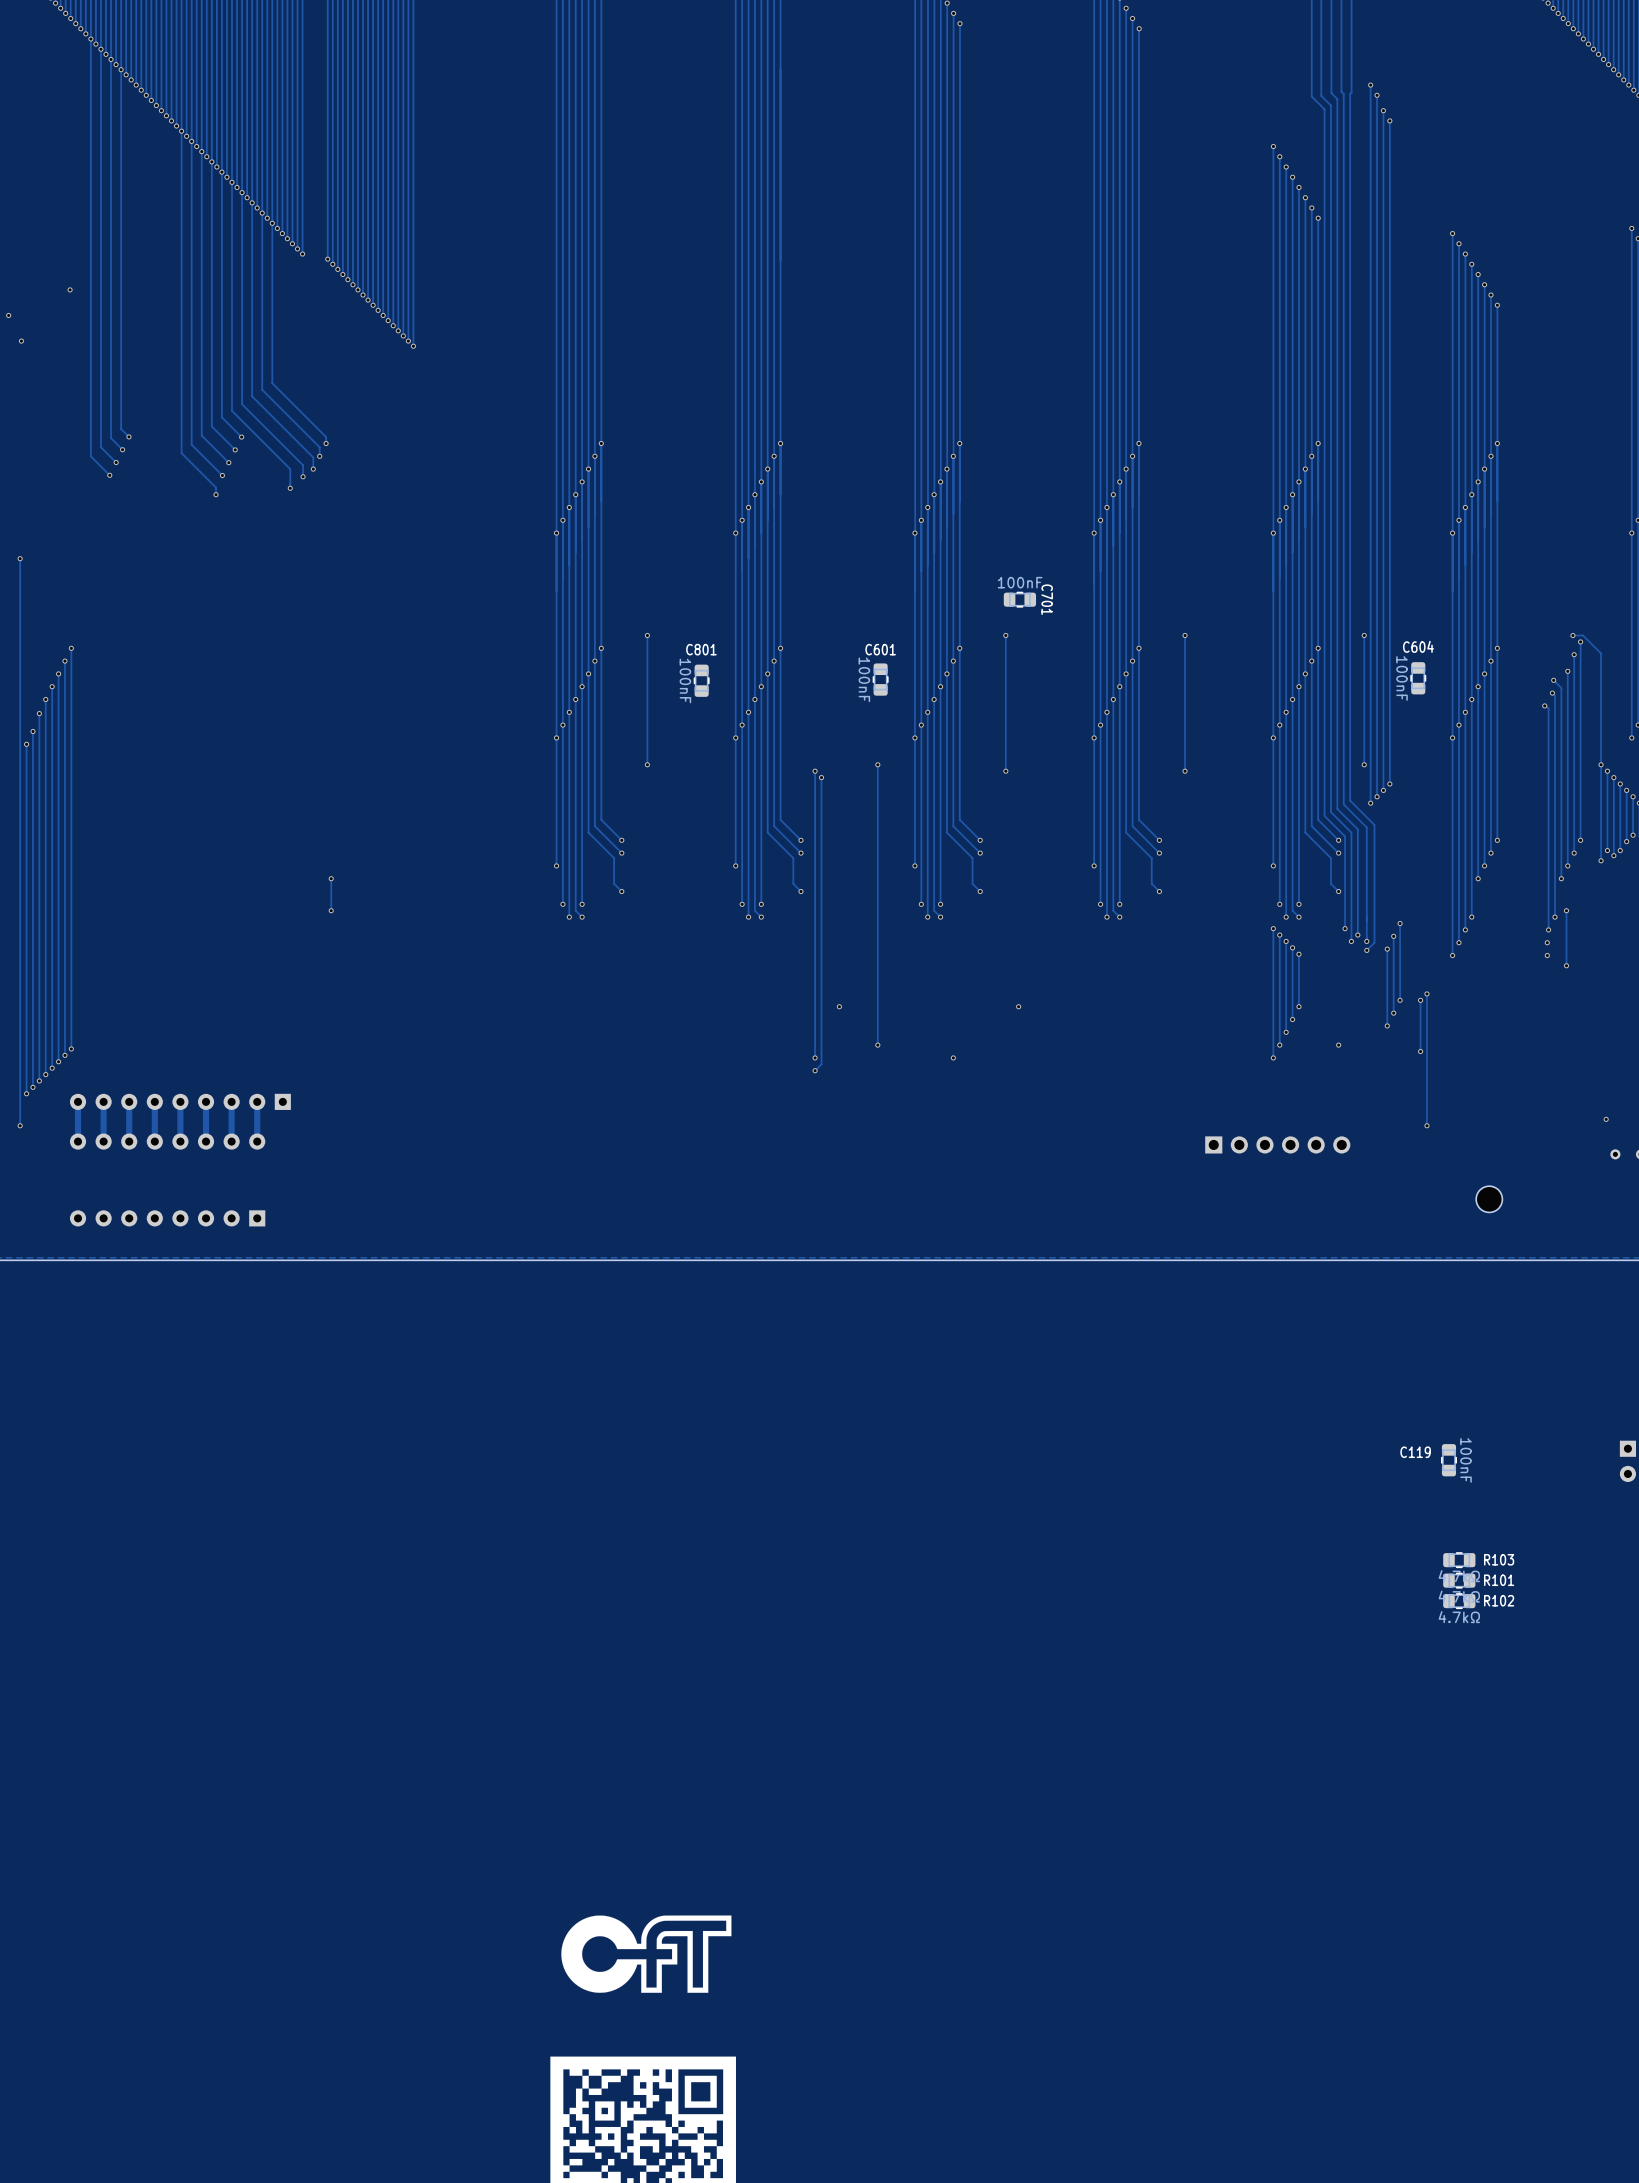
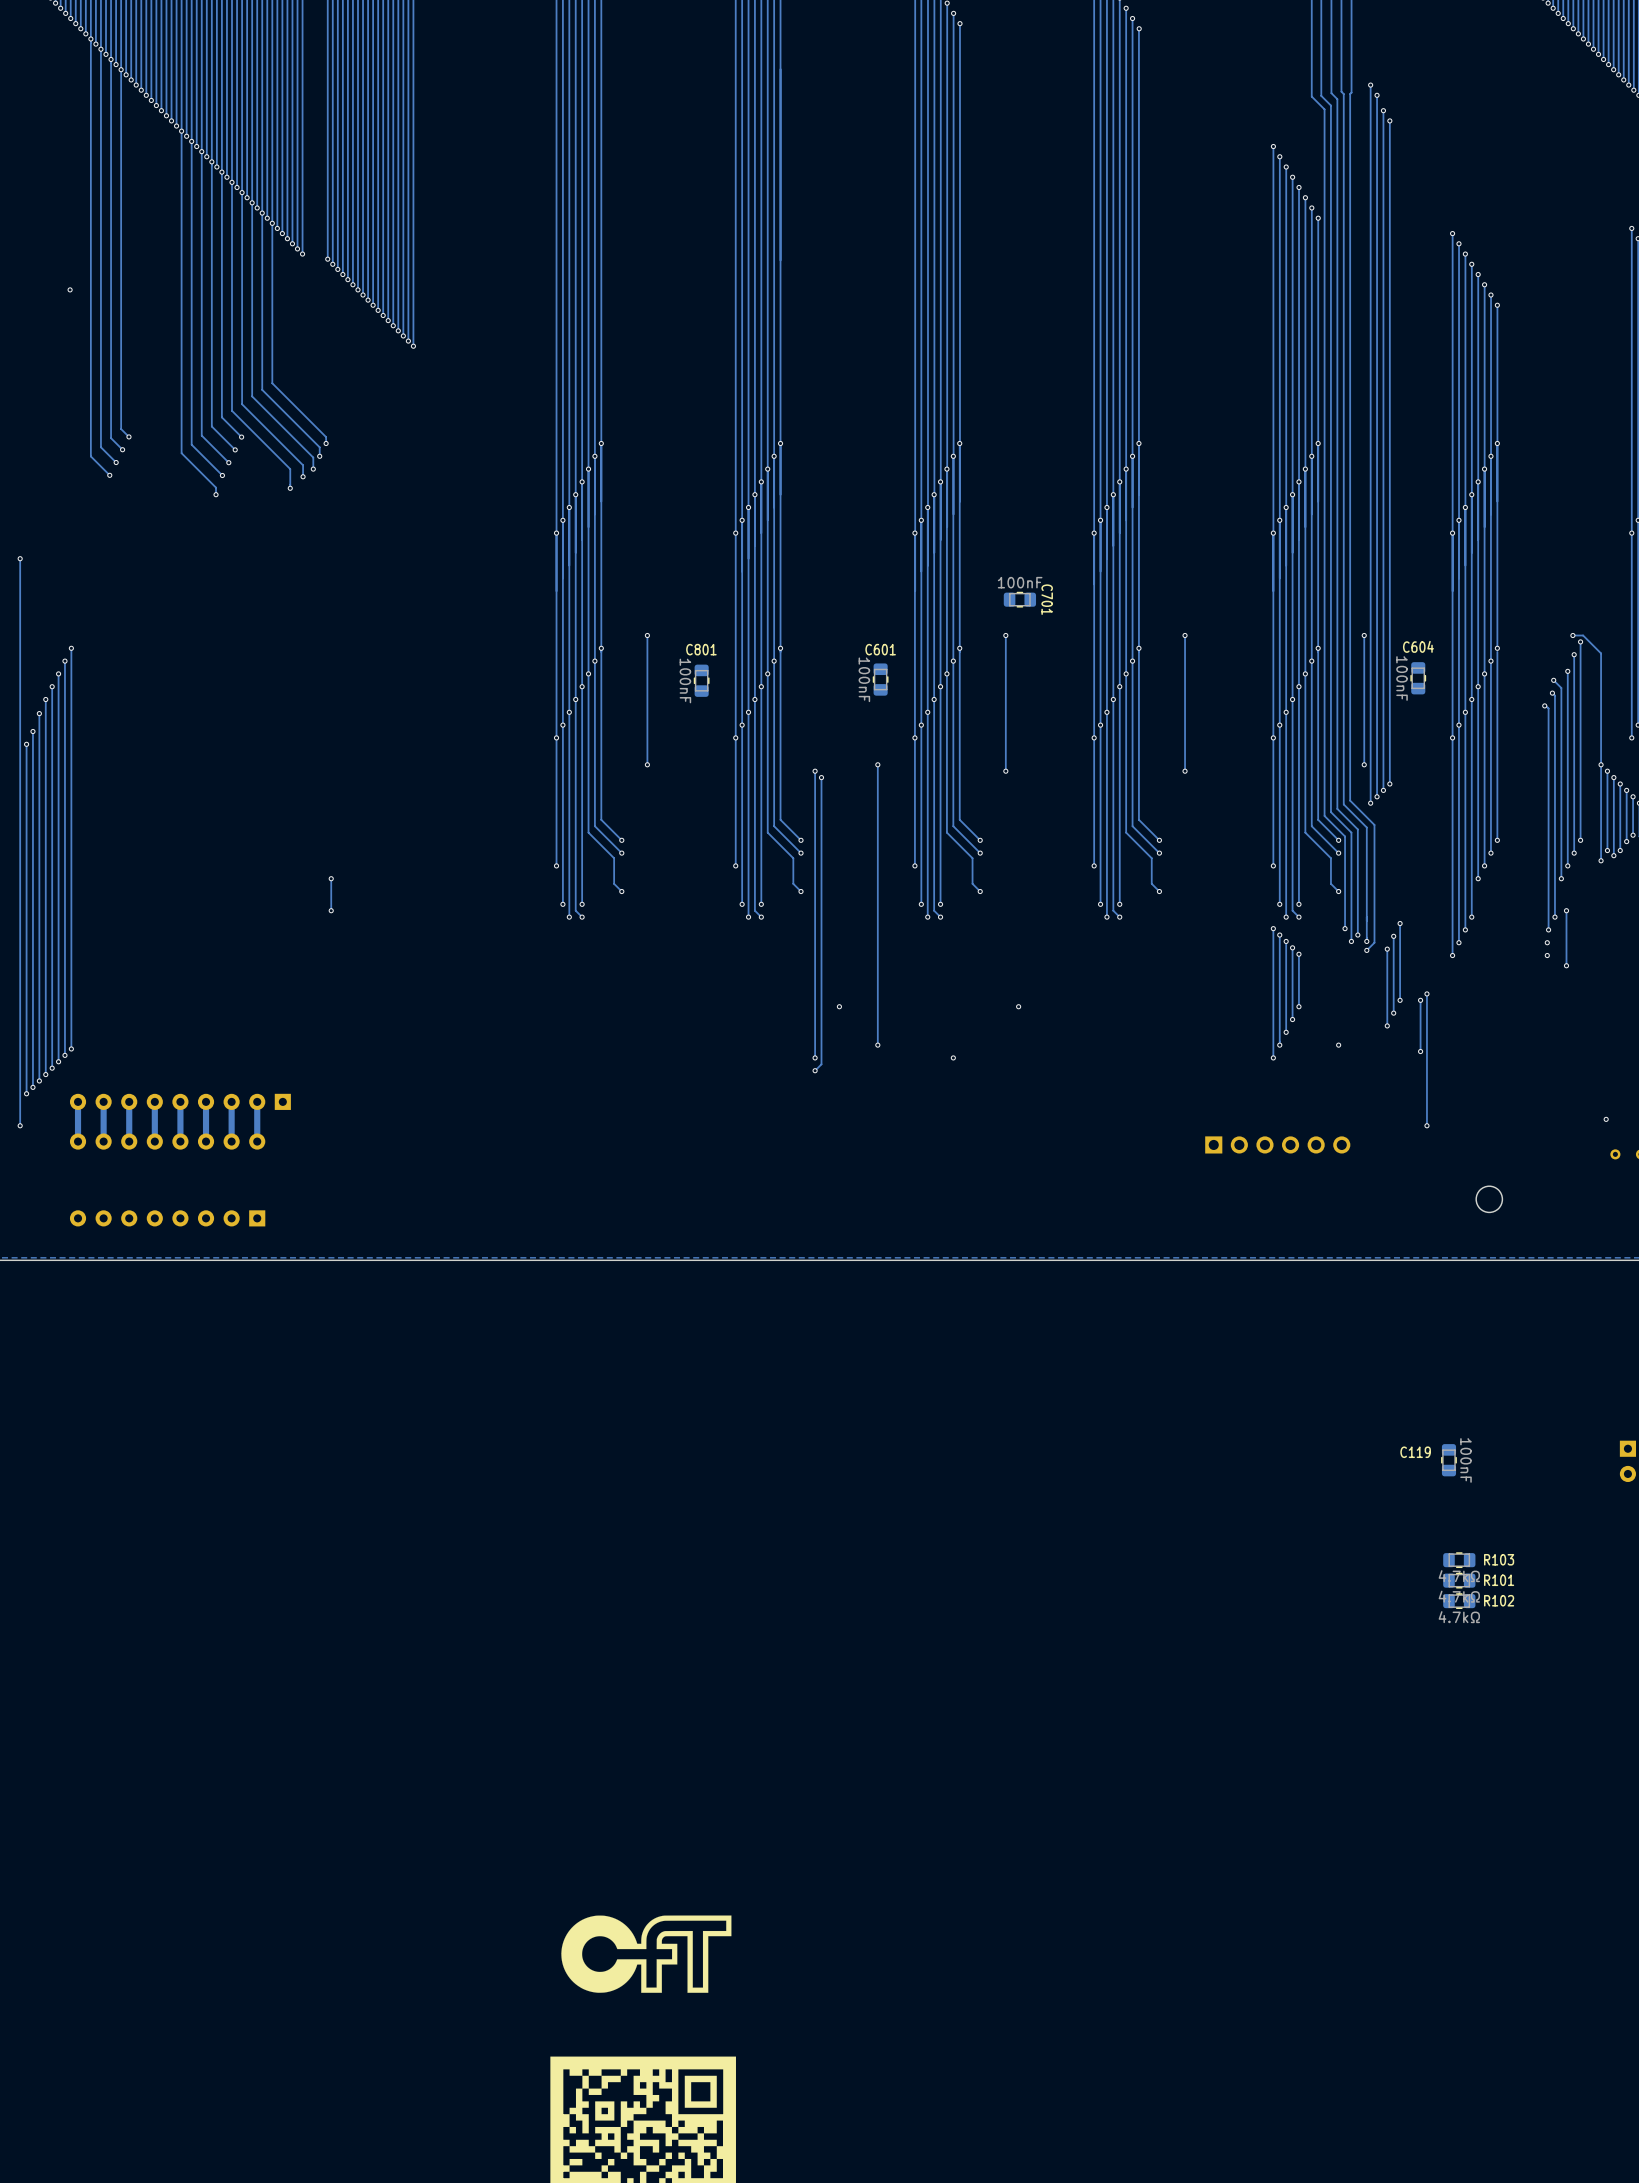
via: (8, 315) -> none
via: (21, 341) -> none

